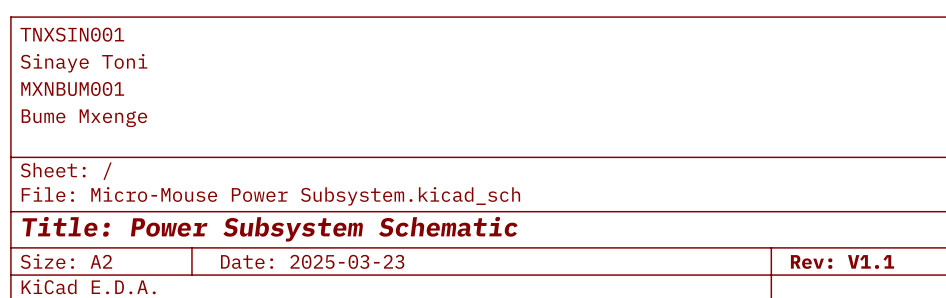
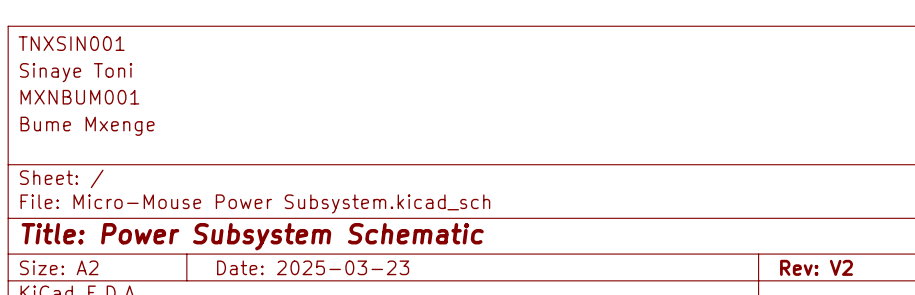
title block: Rev: V1.1 (842, 261) -> Rev: V2 (816, 267)

